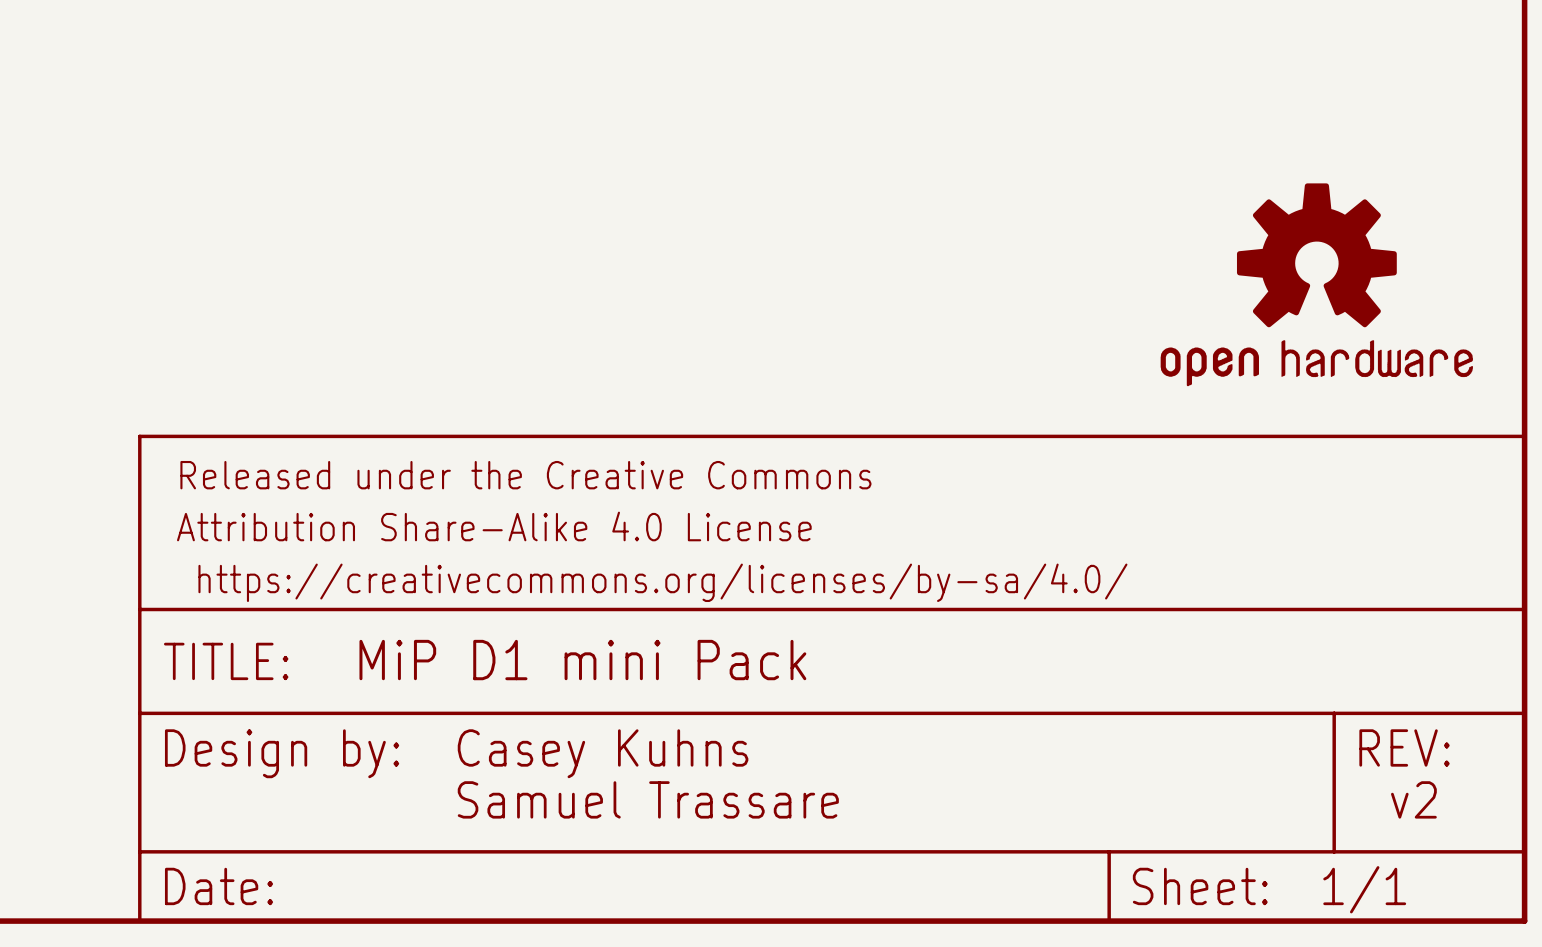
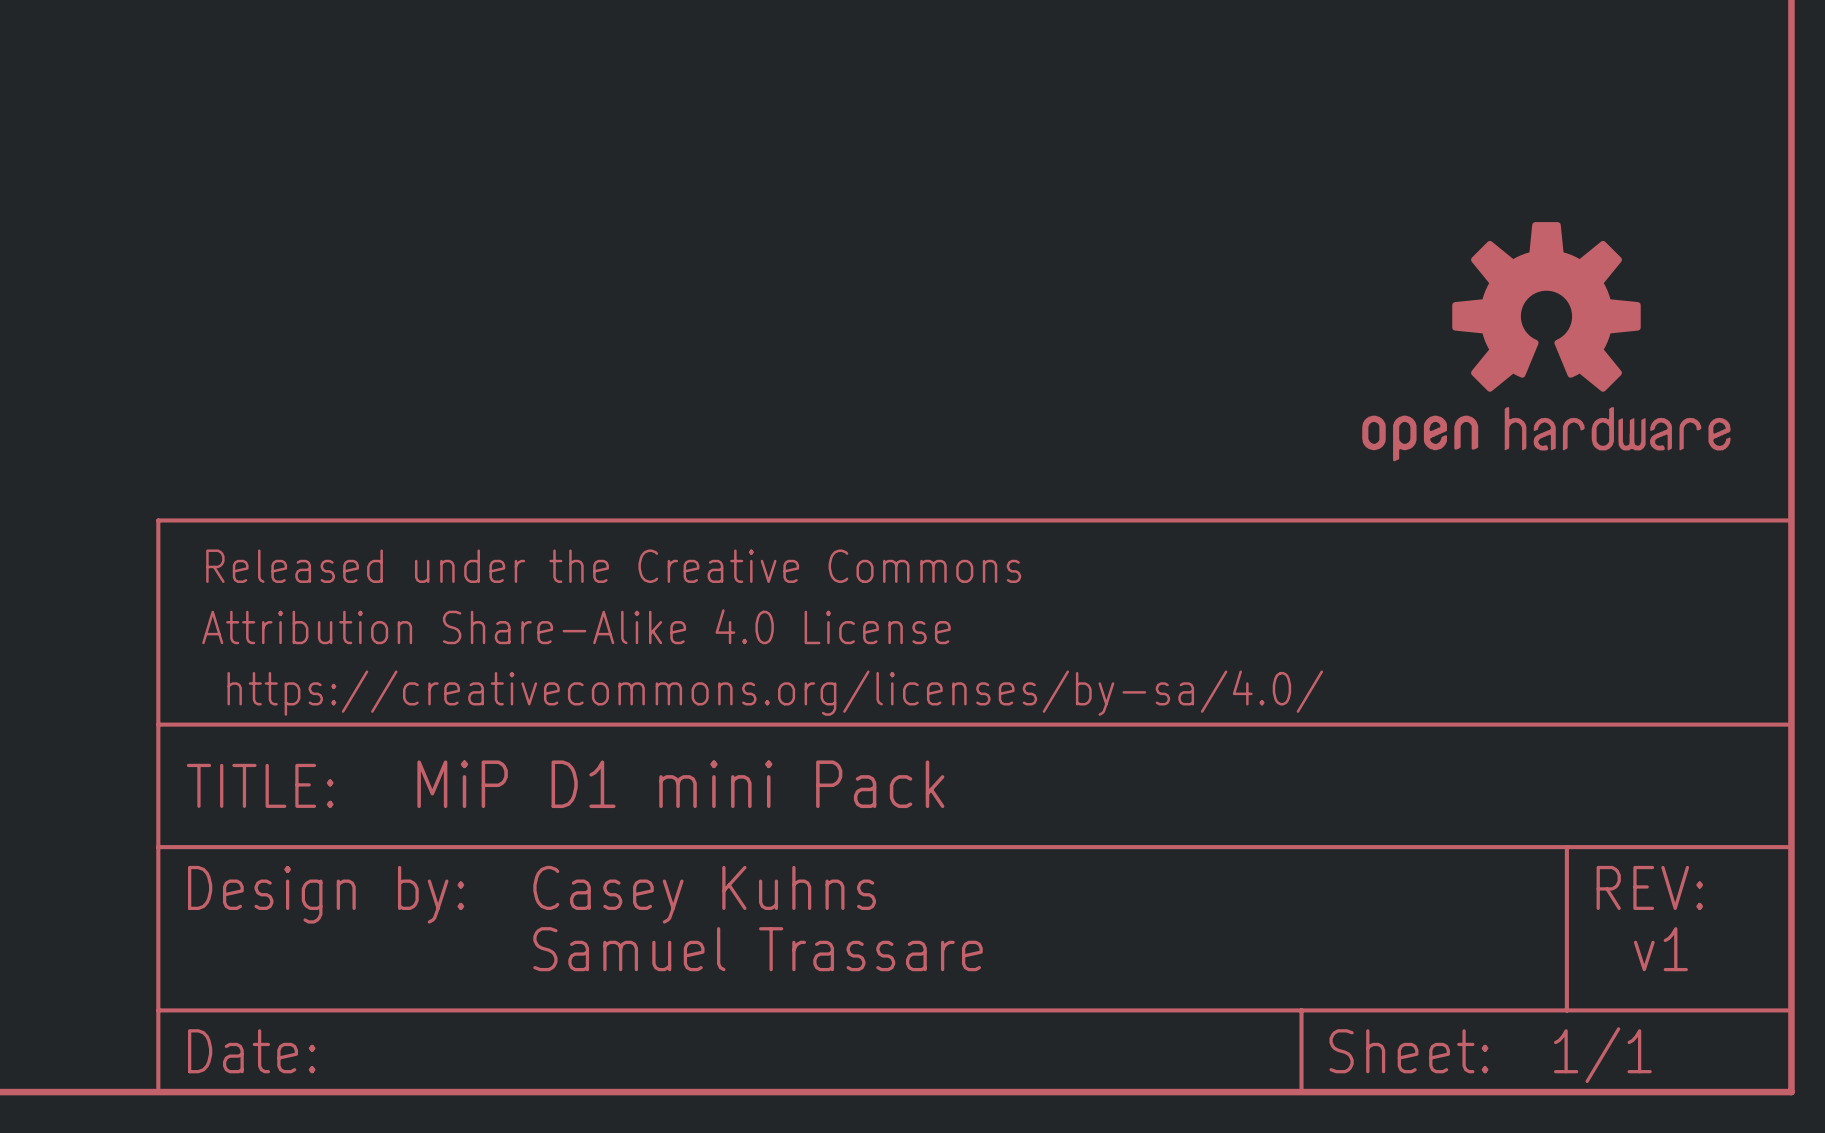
text: v2 (1413, 799) -> v1 (1660, 949)

